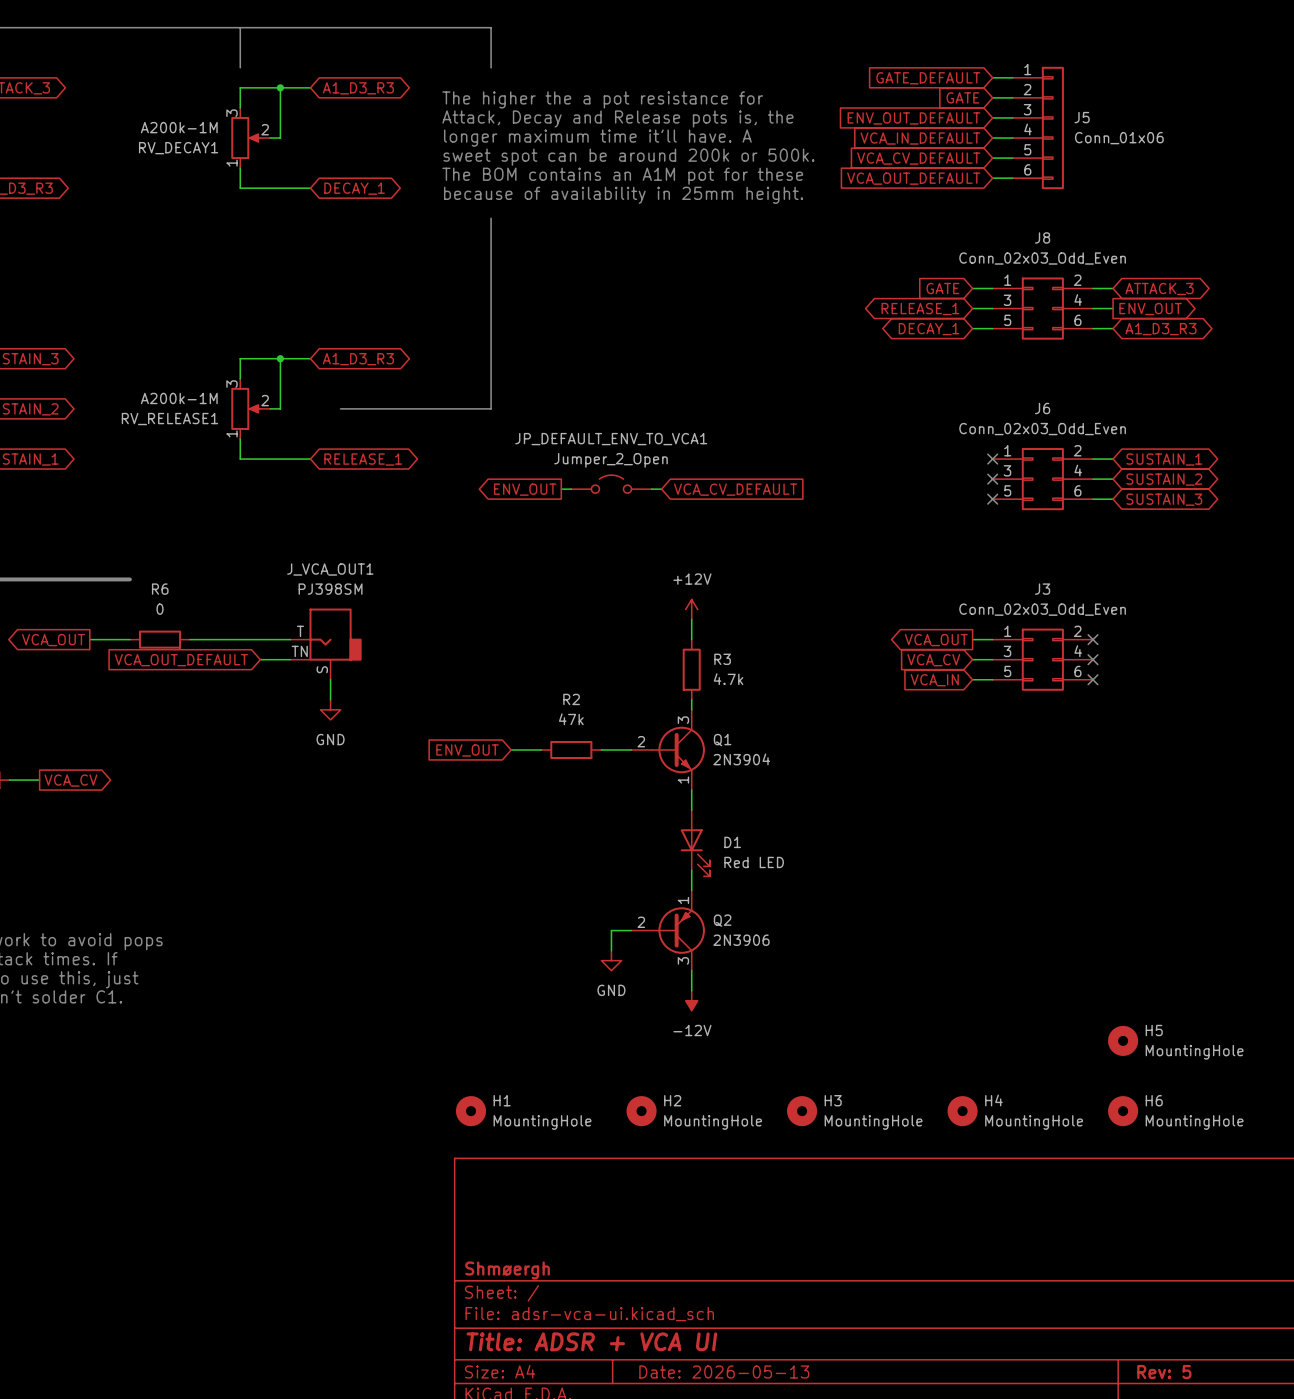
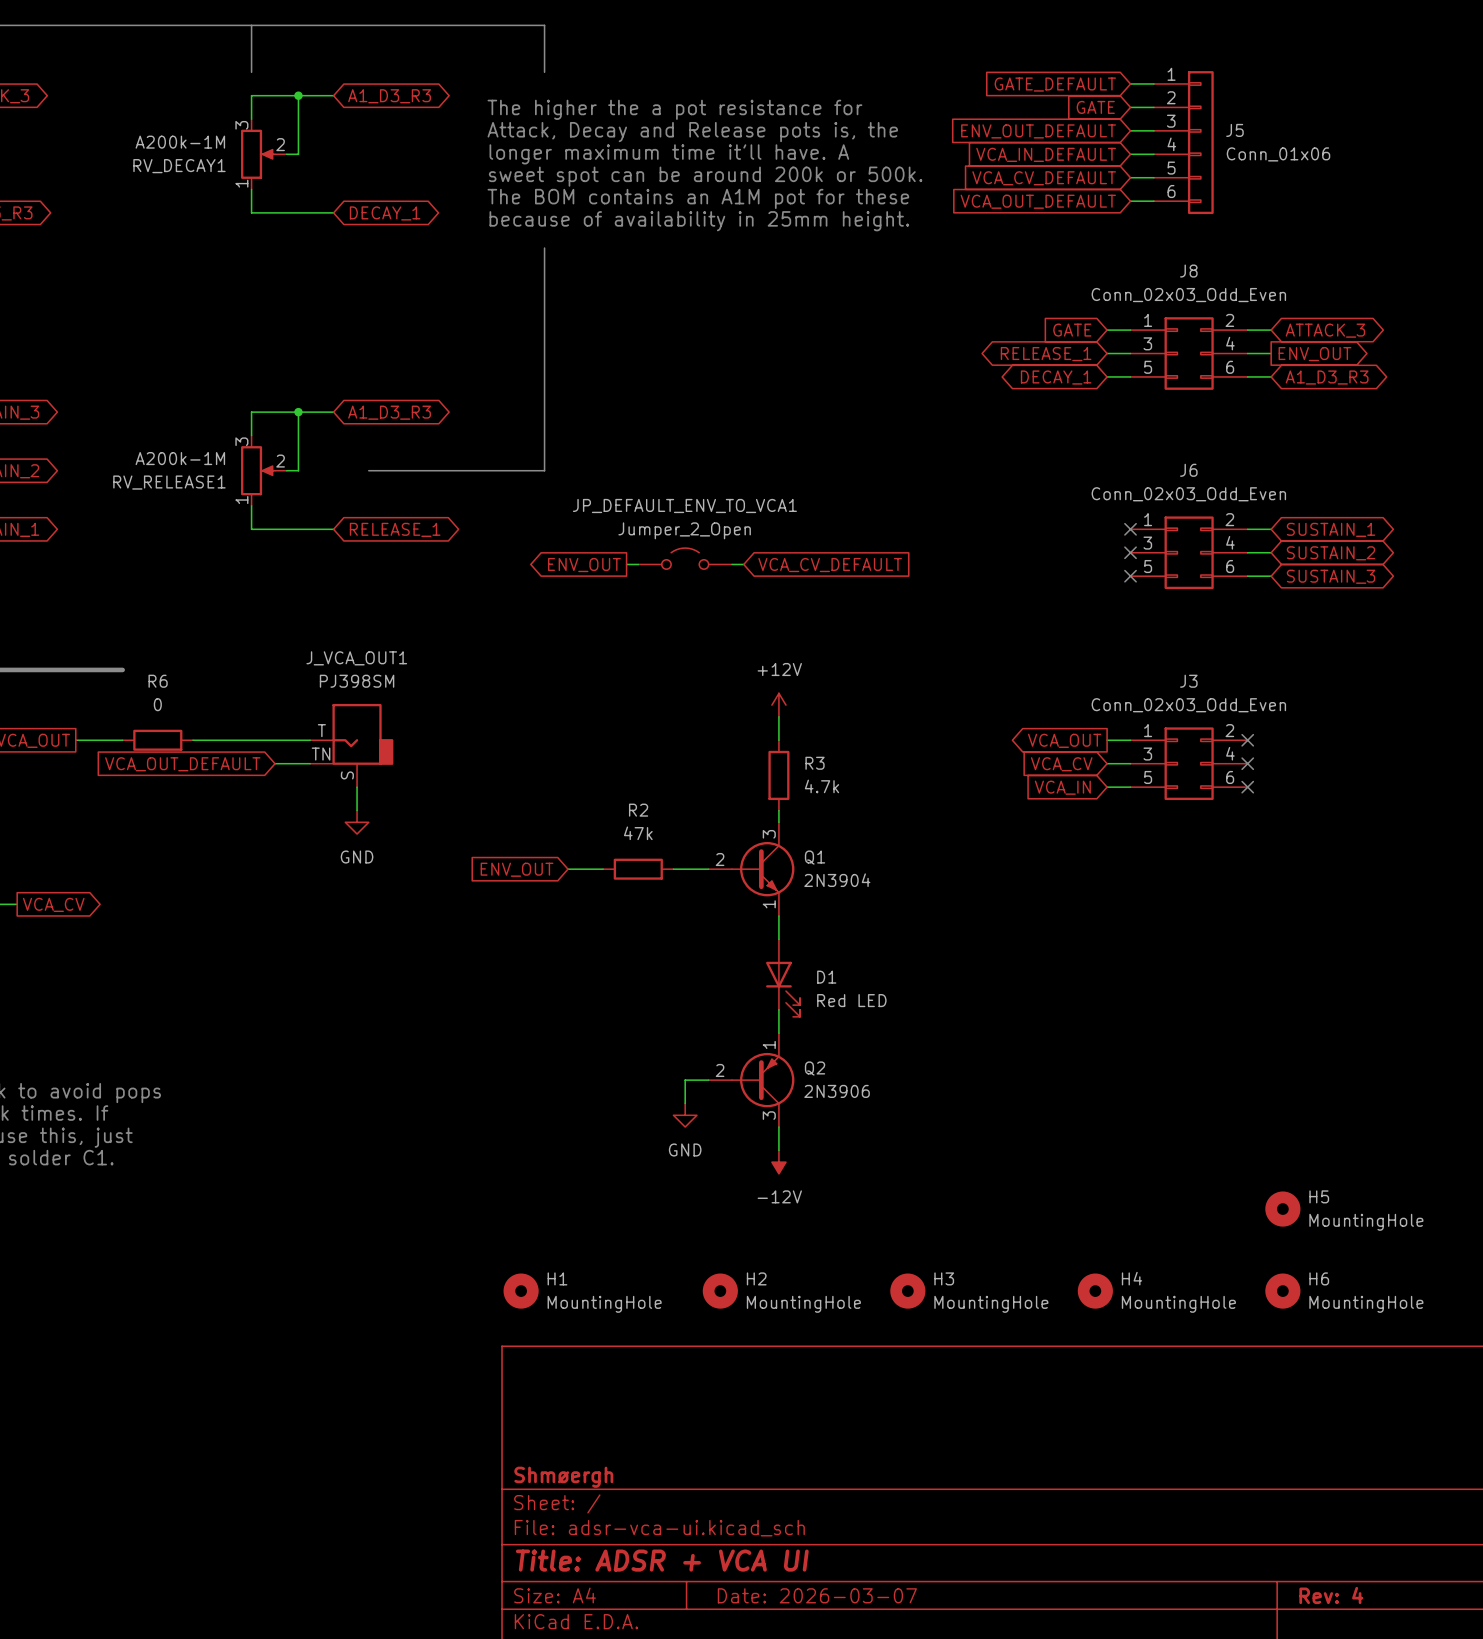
title block: Date: 2026-05-13 (724, 1372) -> Date: 2026-03-07 (817, 1595)
title block: Rev: 5 (1164, 1372) -> Rev: 4 (1331, 1595)

